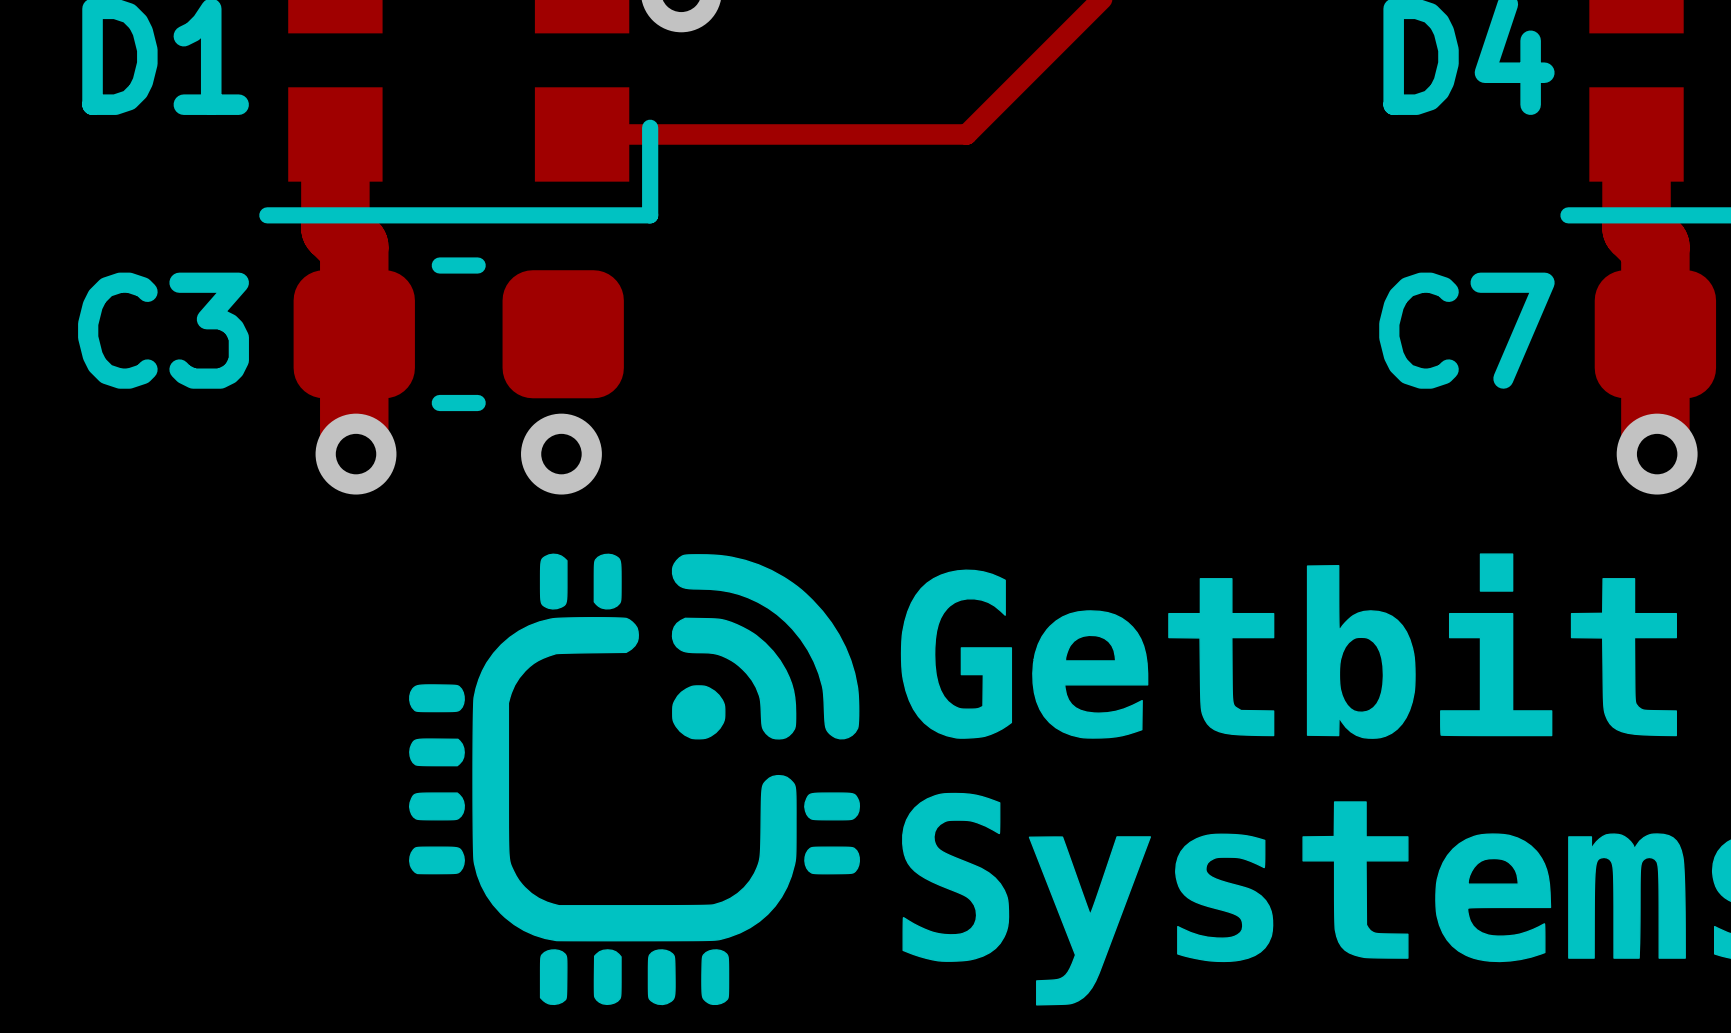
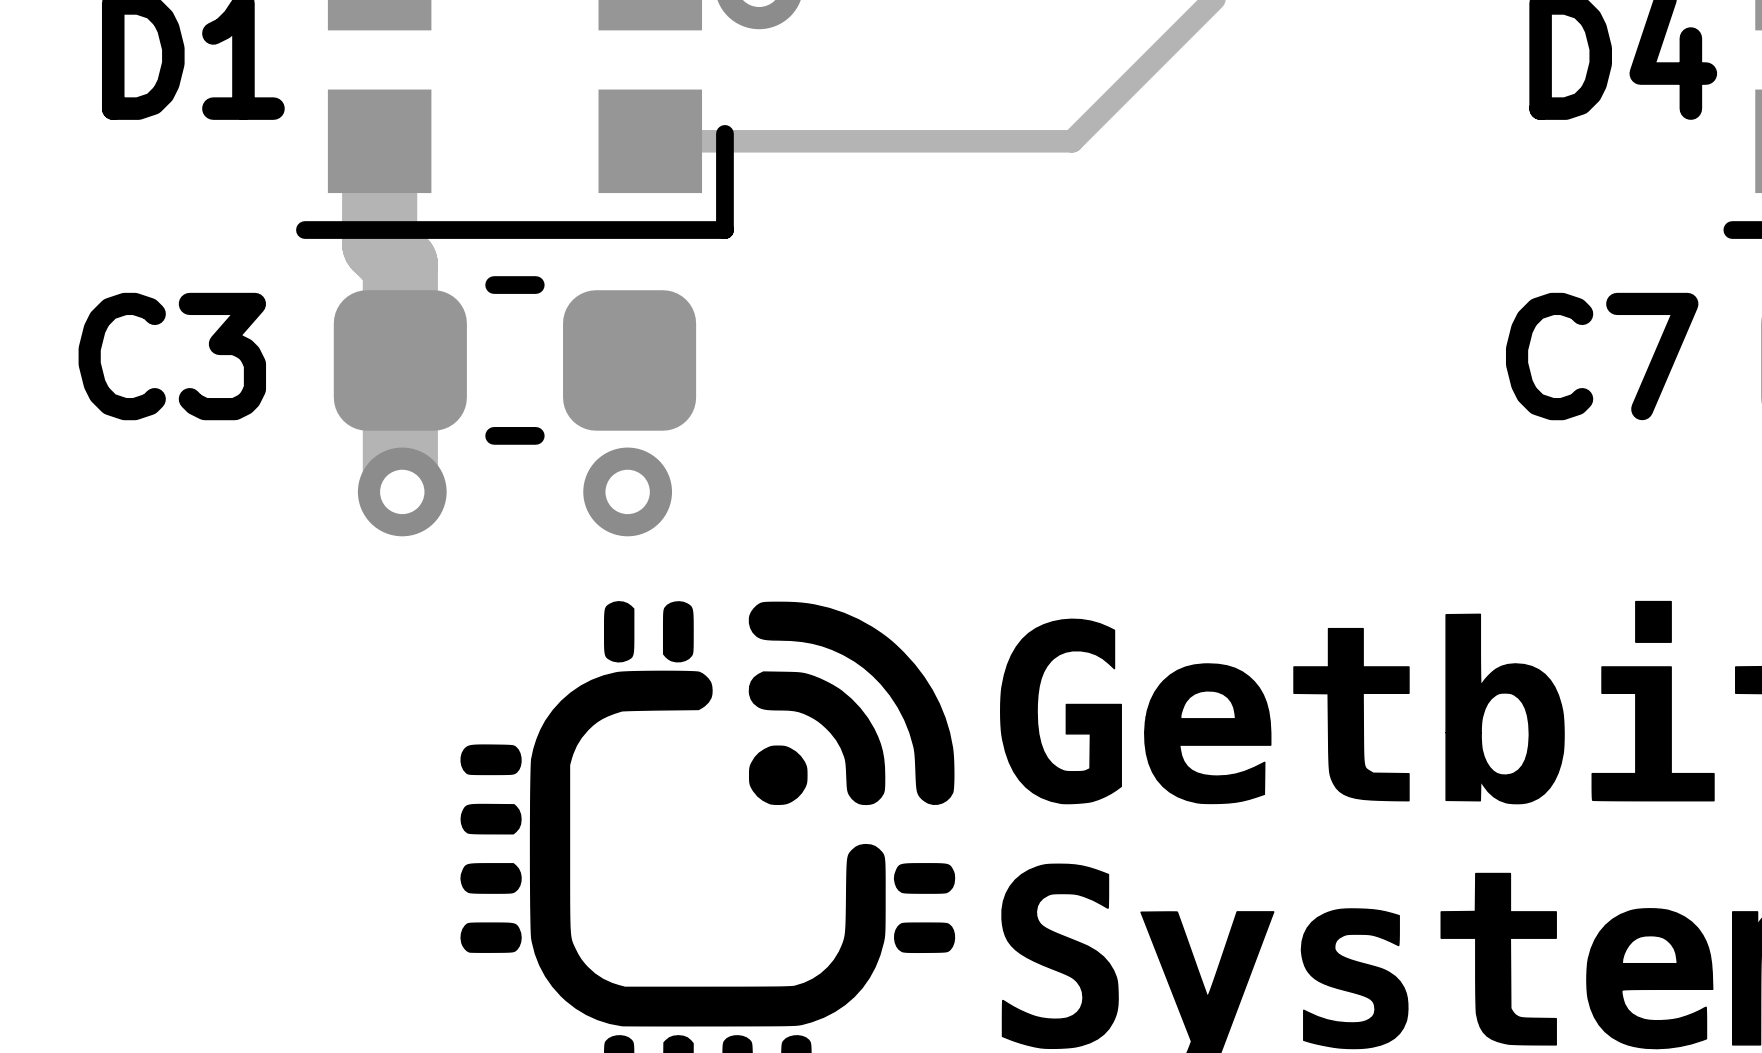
C3 name position: C3 (163, 330) -> C3 (172, 356)
C7 name position: C7 (1466, 330) -> C7 (1602, 356)

